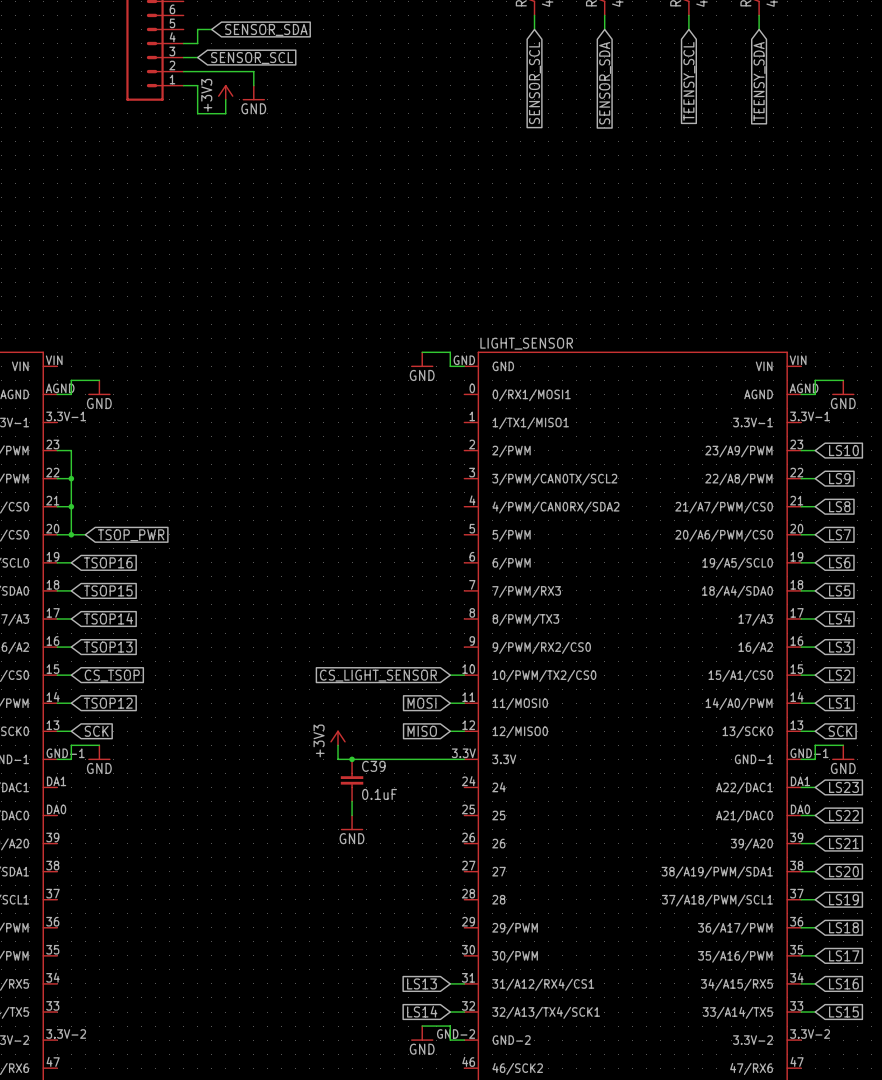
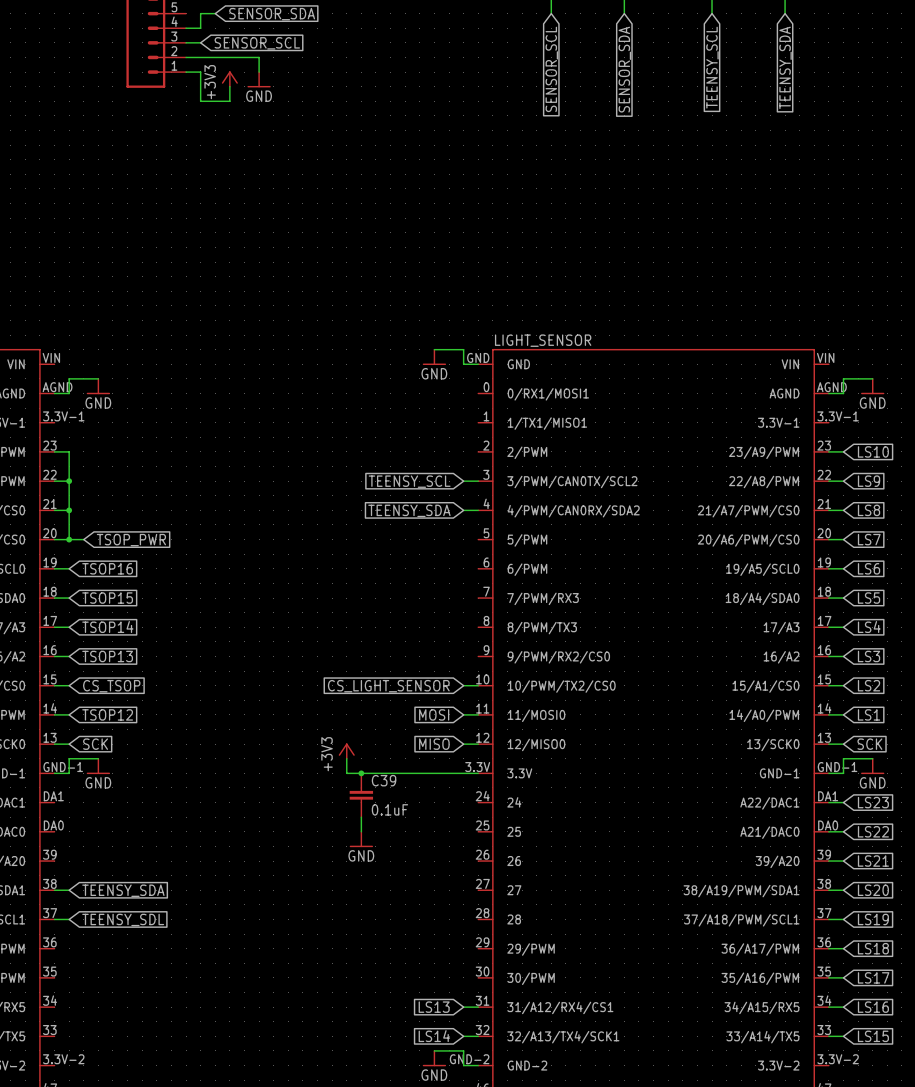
wire: none -> (463, 481) (478, 481)
global label: none -> TEENSY_SCL (409, 481)
wire: none -> (463, 510) (478, 510)
global label: none -> TEENSY_SDA (409, 510)
wire: none -> (54, 890) (69, 890)
global label: none -> TEENSY_SDA (123, 890)
wire: none -> (54, 919) (69, 919)
global label: none -> TEENSY_SDL (123, 919)

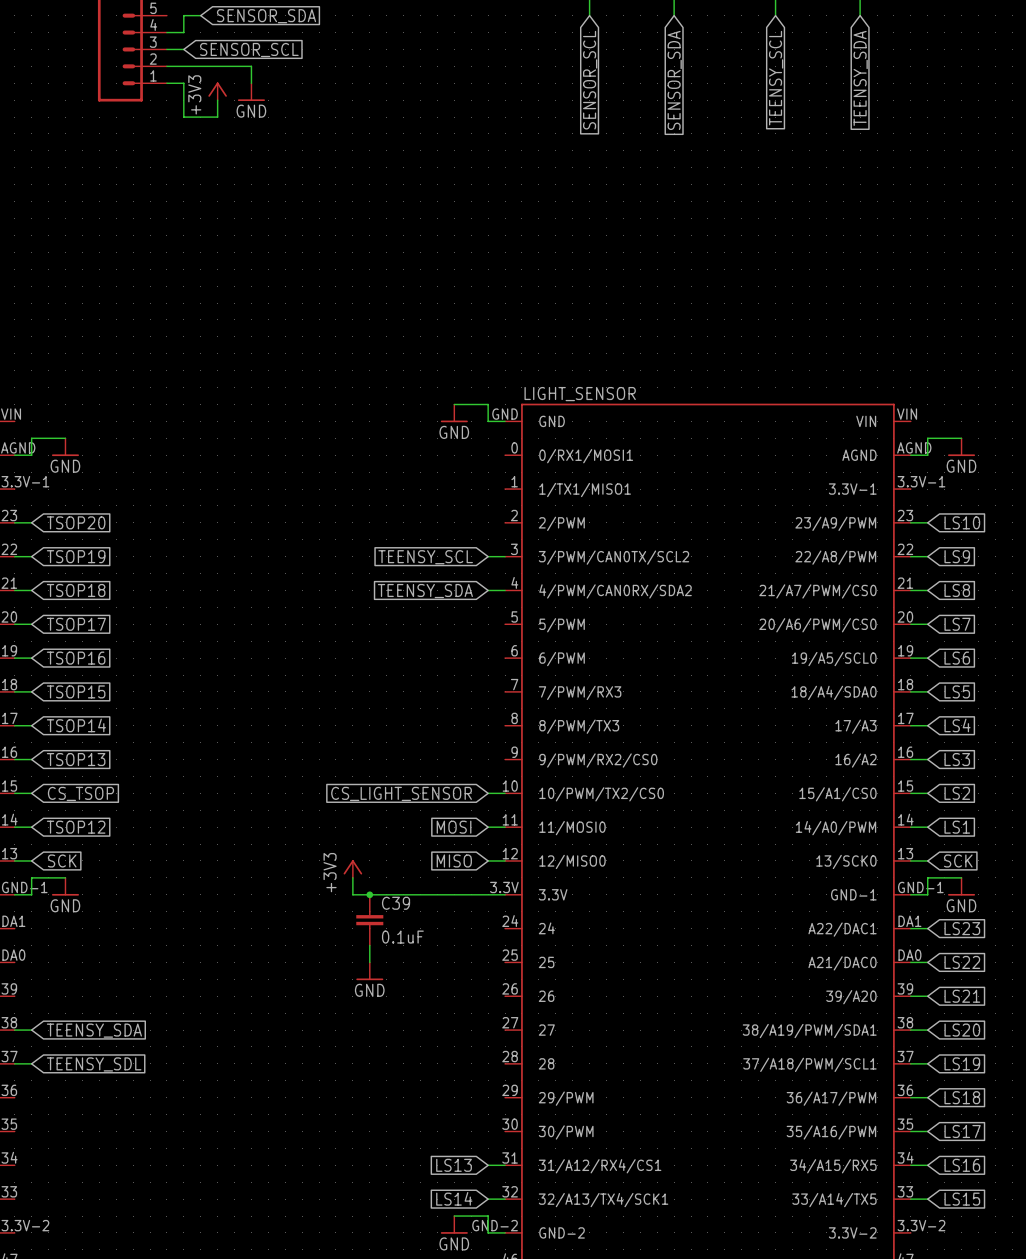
wire: (69, 451) (69, 539) (83, 539) -> none
global label: none -> TSOP20 (76, 522)
junction: (69, 481) -> none
global label: none -> TSOP19 (76, 556)
junction: (69, 510) -> none
global label: none -> TSOP18 (76, 590)
junction: (69, 539) -> none
global label: none -> TSOP17 (76, 624)
global label: TSOP_PWR (131, 540) -> none

